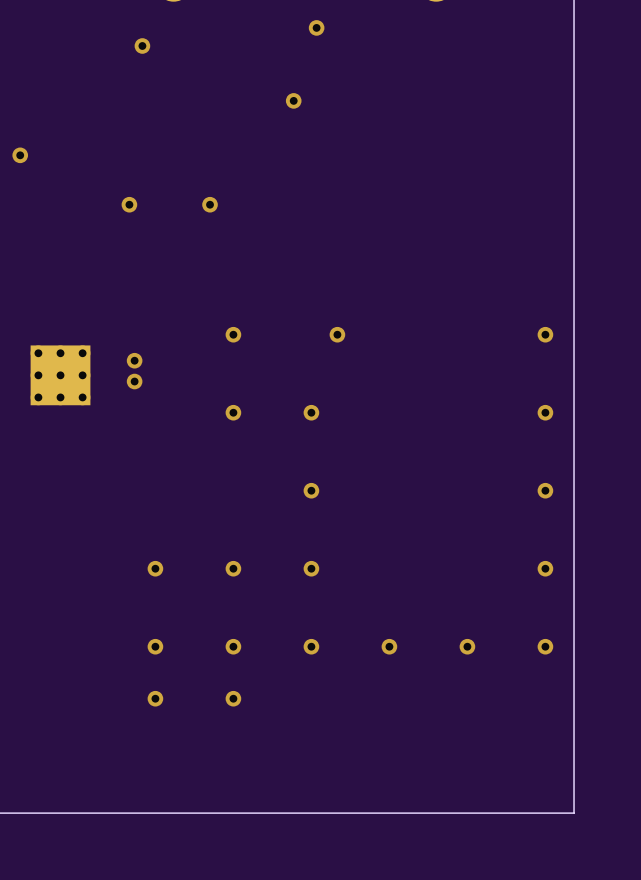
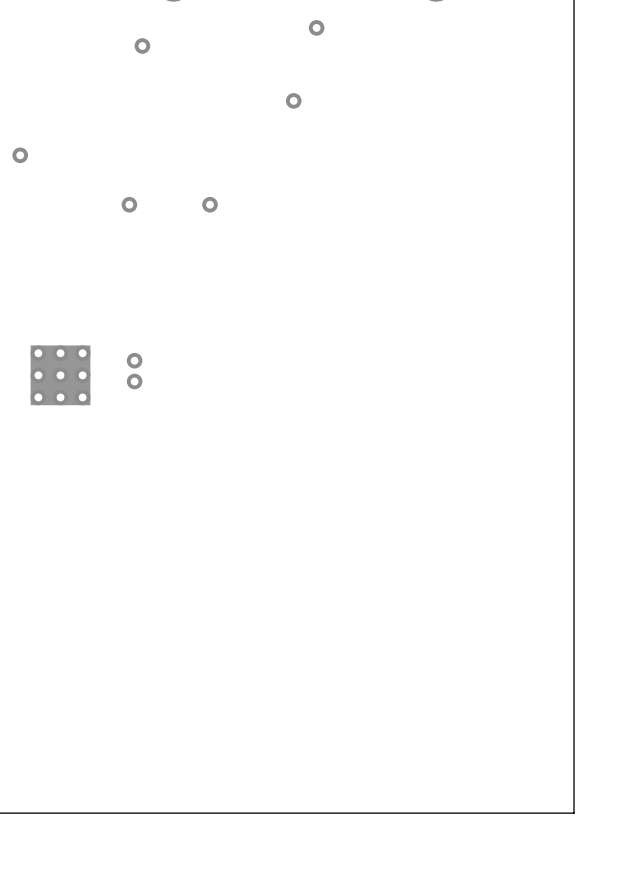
via: (233, 334) -> none
via: (337, 334) -> none
via: (545, 334) -> none
via: (233, 412) -> none
via: (311, 412) -> none
via: (545, 412) -> none
via: (311, 490) -> none
via: (545, 490) -> none
via: (155, 568) -> none
via: (233, 568) -> none
via: (311, 568) -> none
via: (545, 568) -> none
via: (155, 646) -> none
via: (233, 646) -> none
via: (311, 646) -> none
via: (389, 646) -> none
via: (467, 646) -> none
via: (545, 646) -> none
via: (155, 698) -> none
via: (233, 698) -> none

